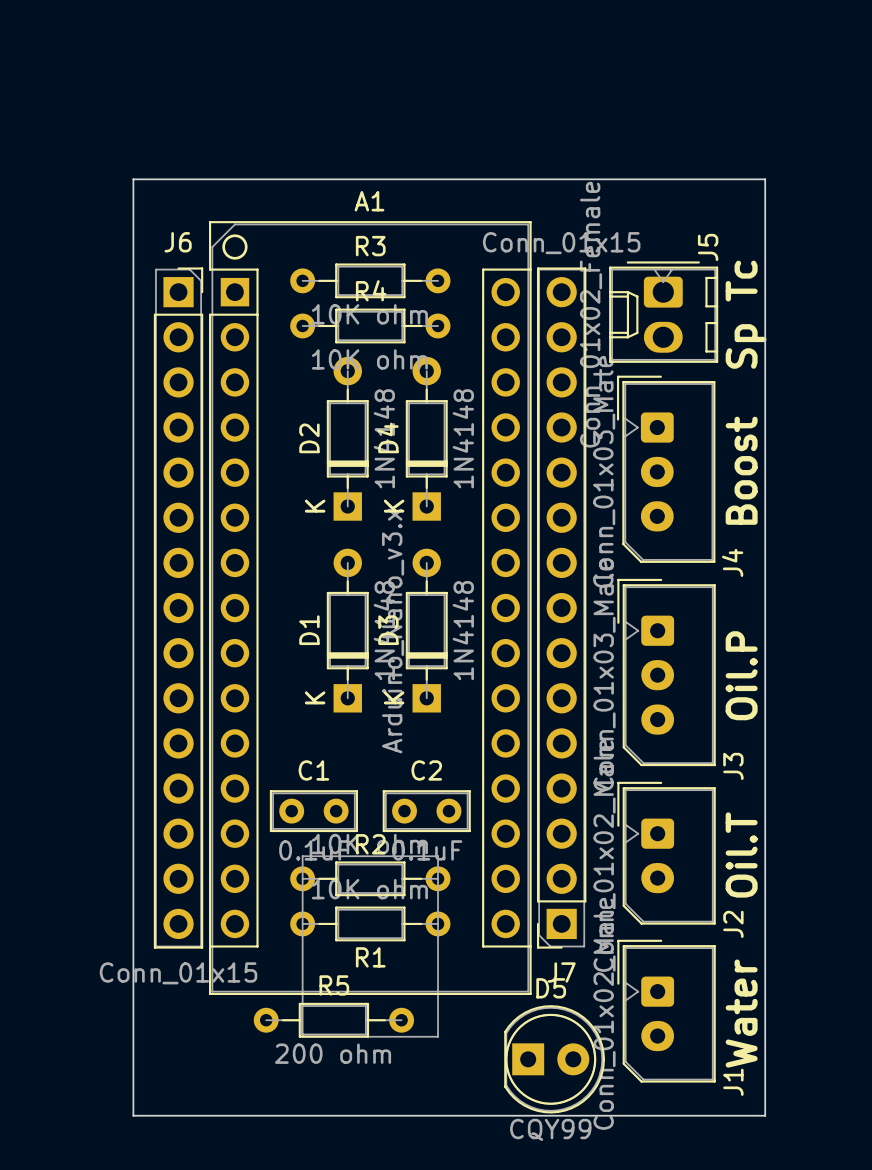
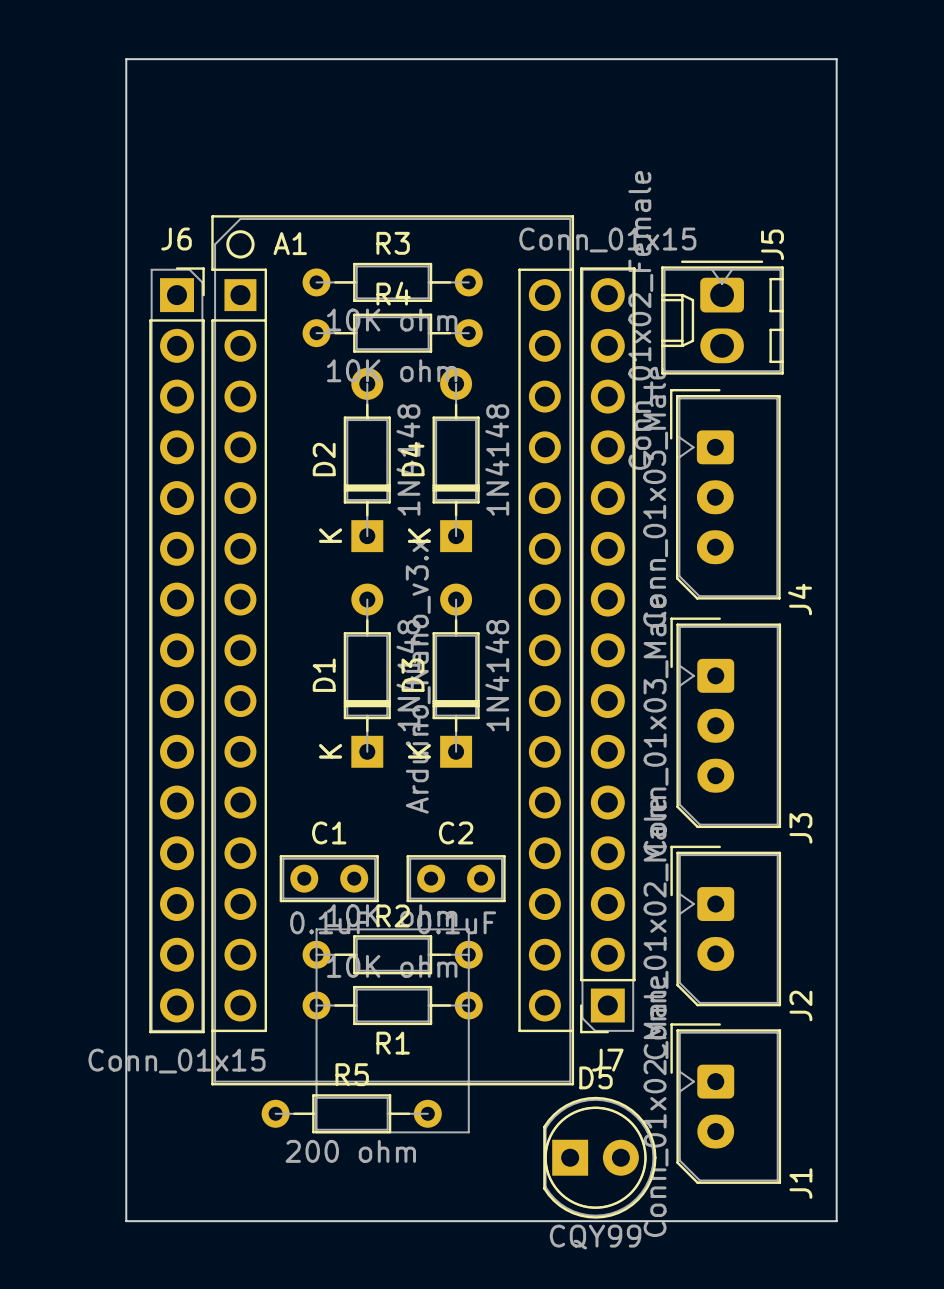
board edge: (133, 179) (765, 179) -> (126, 168) (126, 59) (836, 59) (836, 168)
A1 name position: A1 (369, 201) -> A1 (290, 243)
text: Sp Tc (746, 314) -> none
text: Boost (741, 470) -> none
text: Oil.P (741, 675) -> none
text: Oil.T (741, 854) -> none
text: Water (741, 1013) -> none

